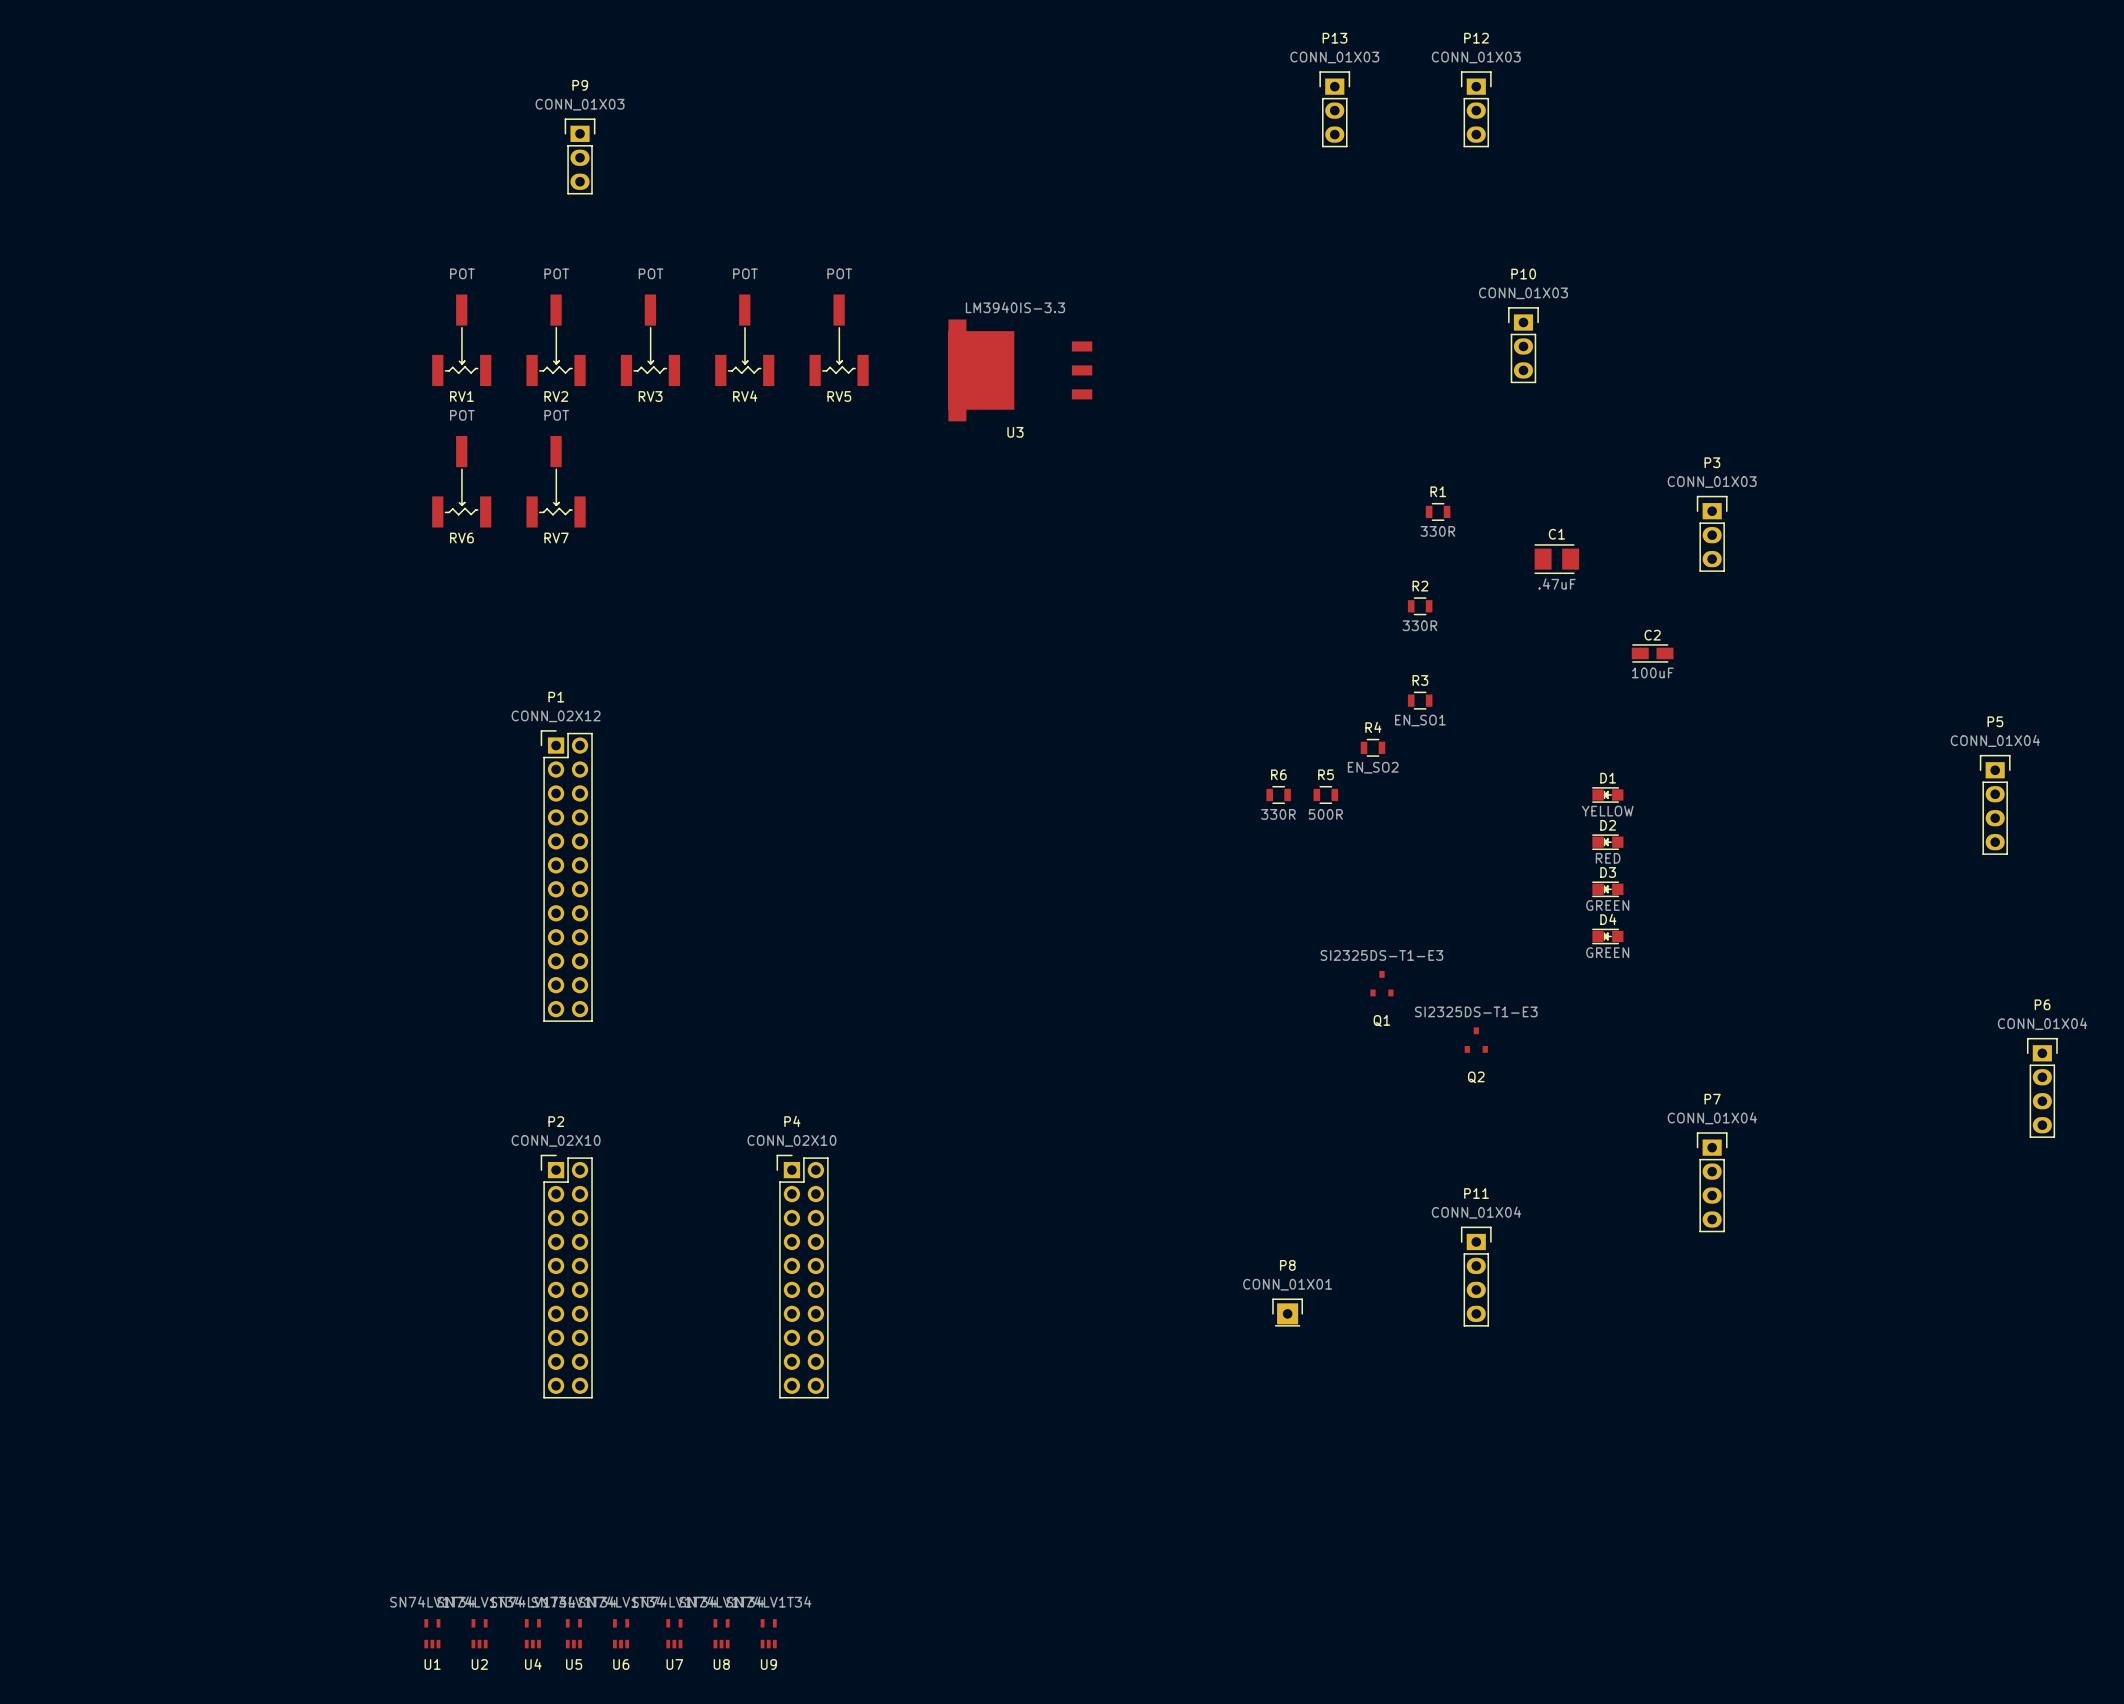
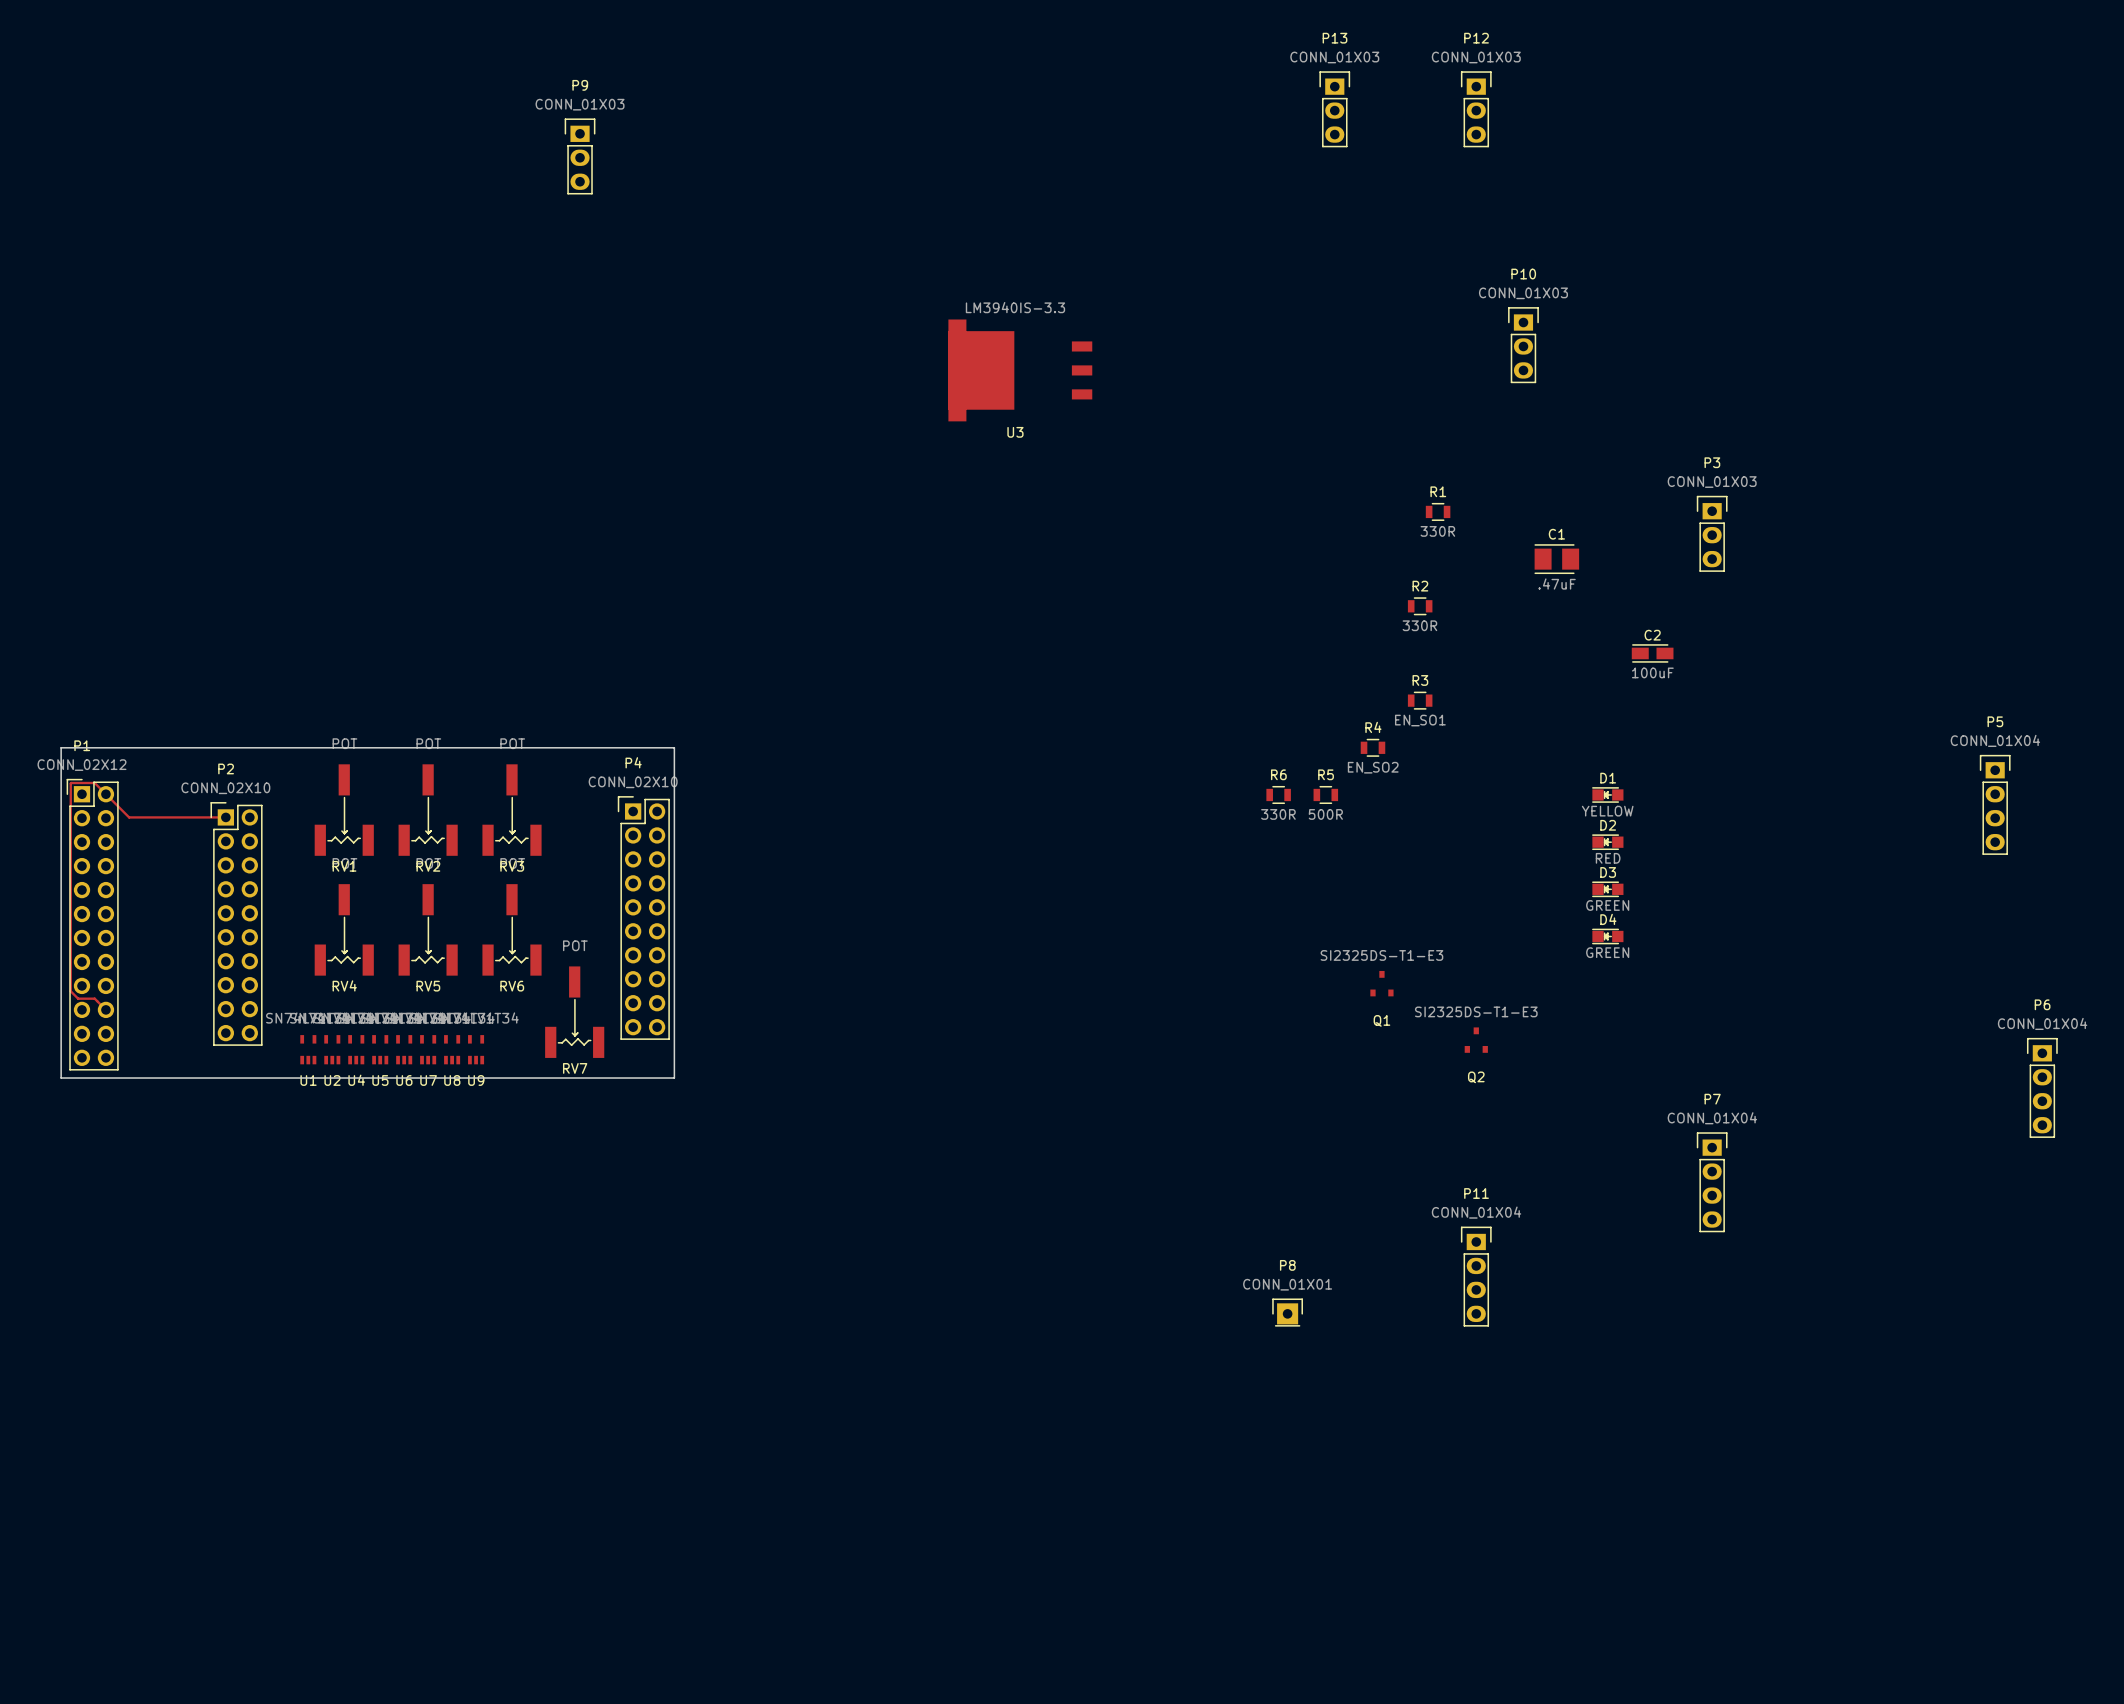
RV1 position: (461, 340) -> (344, 810)
RV2 position: (556, 340) -> (428, 810)
RV3 position: (650, 340) -> (512, 810)
RV4 position: (744, 340) -> (344, 929)
RV5 position: (839, 340) -> (428, 929)
RV6 position: (461, 481) -> (512, 929)
RV7 position: (556, 481) -> (574, 1012)
board edge: none -> (61, 747) (674, 747) (674, 1078) (61, 1078) (61, 747)
top track: none -> (225, 817) (129, 817) (94, 783) (70, 783) (70, 991) (78, 998) (94, 998) (105, 1009)
P1 position: (566, 876) -> (92, 924)
P2 position: (566, 1276) -> (236, 923)
P4 position: (802, 1276) -> (643, 918)
U1 position: (432, 1633) -> (308, 1049)
U2 position: (479, 1633) -> (332, 1049)
U4 position: (532, 1633) -> (356, 1049)
U5 position: (573, 1633) -> (380, 1049)
U6 position: (621, 1633) -> (404, 1049)
U7 position: (674, 1633) -> (428, 1049)
U8 position: (721, 1633) -> (452, 1049)
U9 position: (768, 1633) -> (476, 1049)

